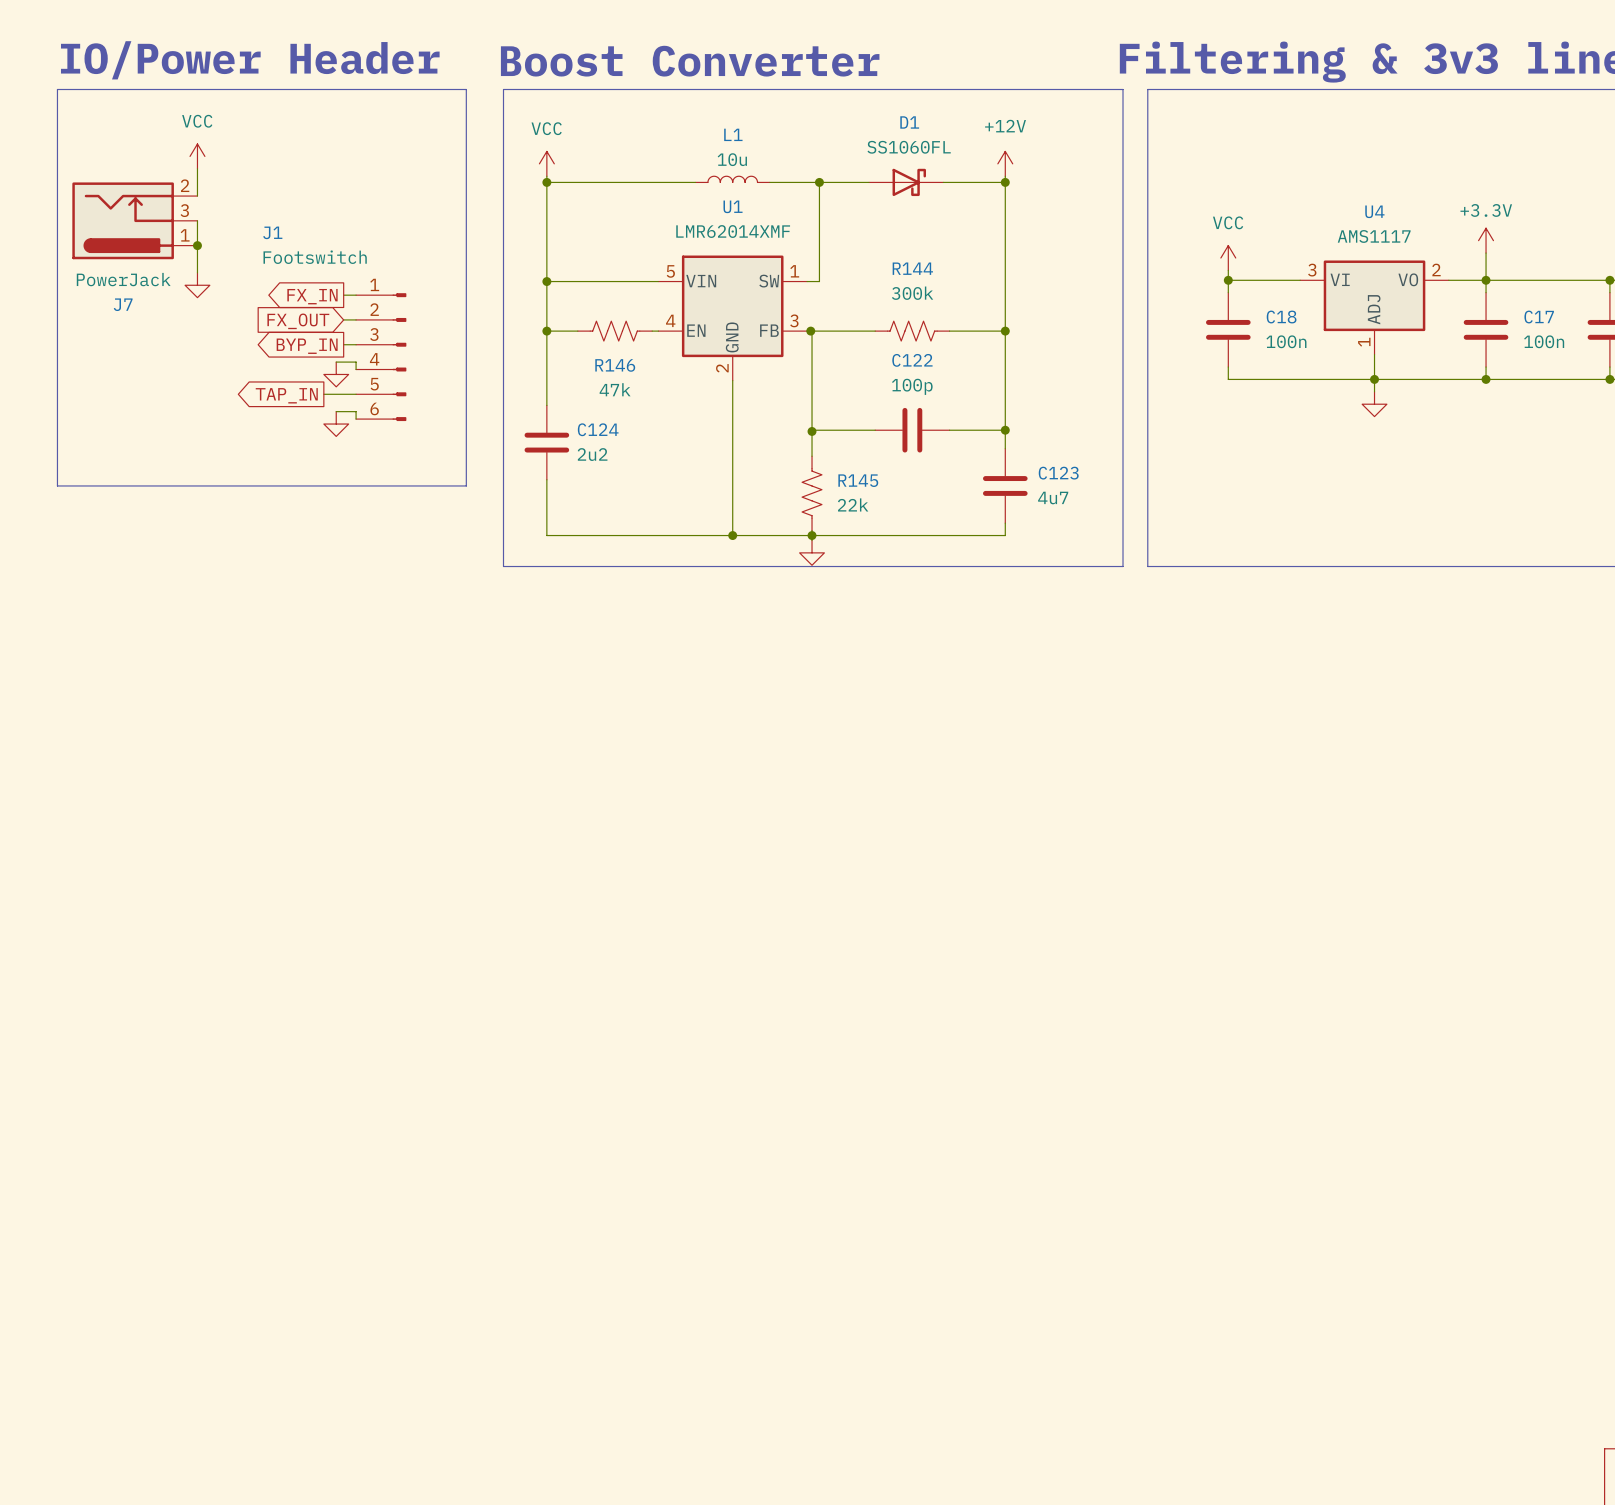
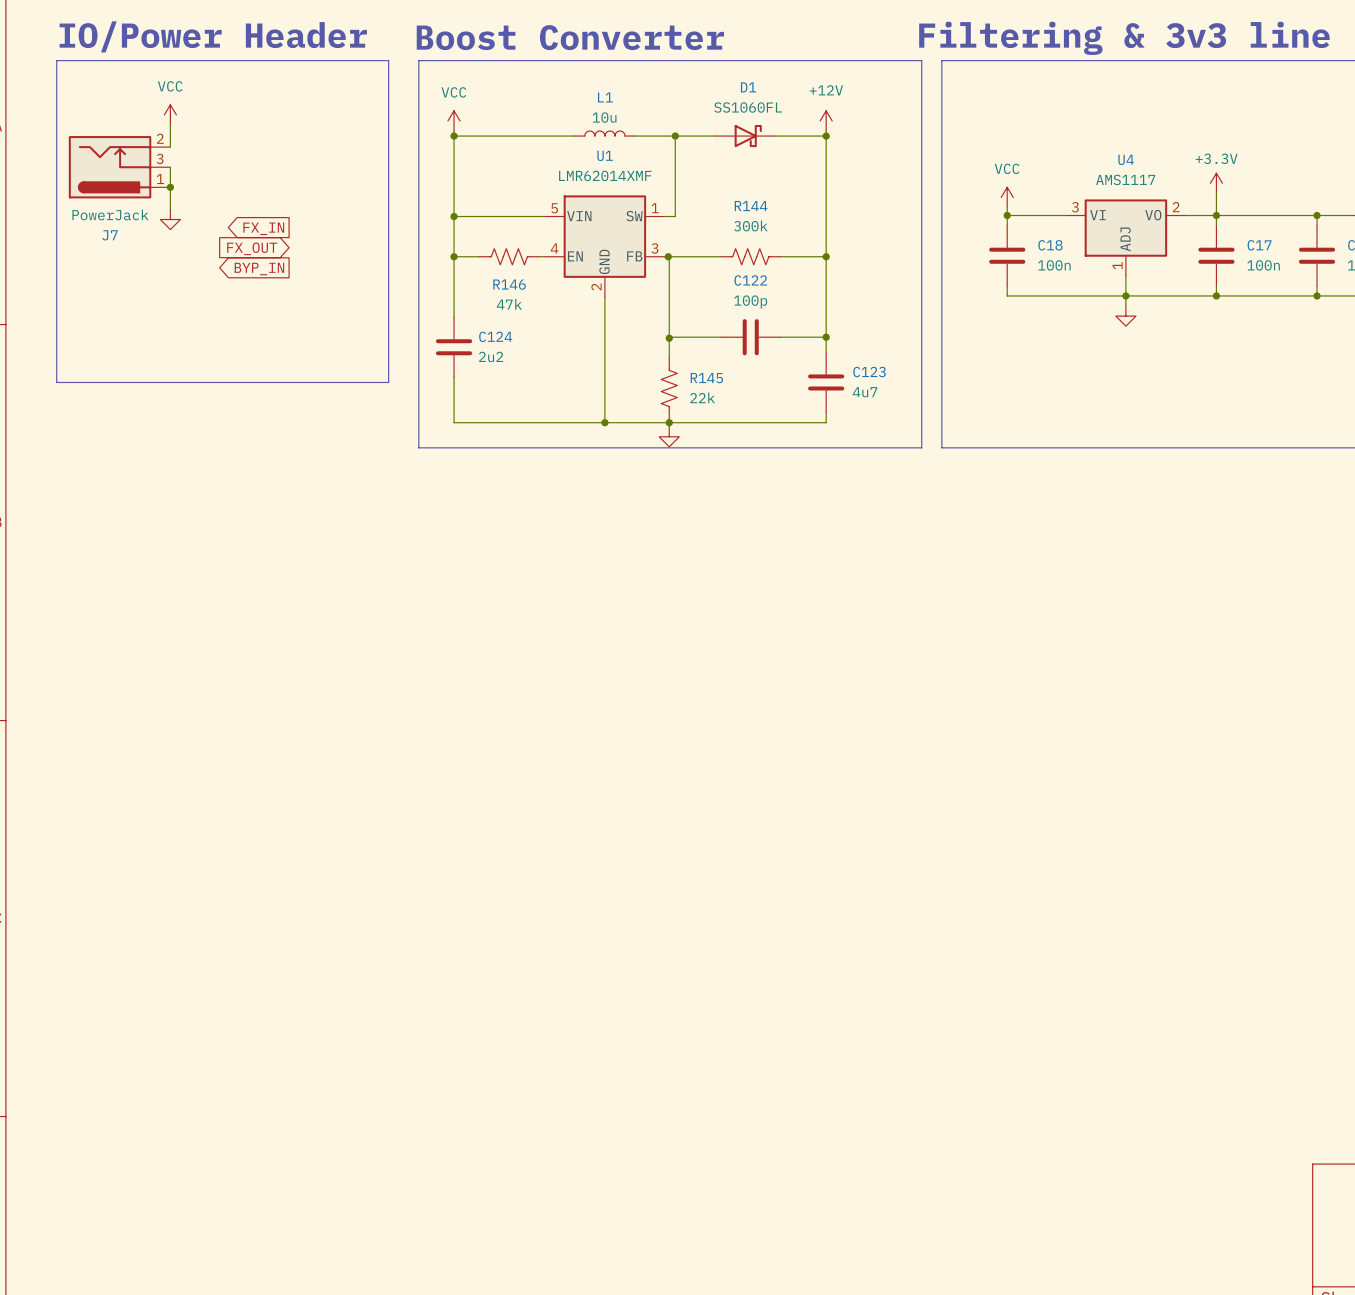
wire: (343, 295) (356, 295) -> none
wire: (343, 319) (356, 319) -> none
wire: (343, 344) (356, 344) -> none
J1: Footswitch (381, 357) -> none
wire: (336, 362) (356, 362) (356, 369) -> none
power symbol: (336, 374) -> none
wire: (323, 394) (356, 394) -> none
global label: TAP_IN (286, 395) -> none
wire: (336, 411) (356, 411) (356, 419) -> none
power symbol: (336, 424) -> none

